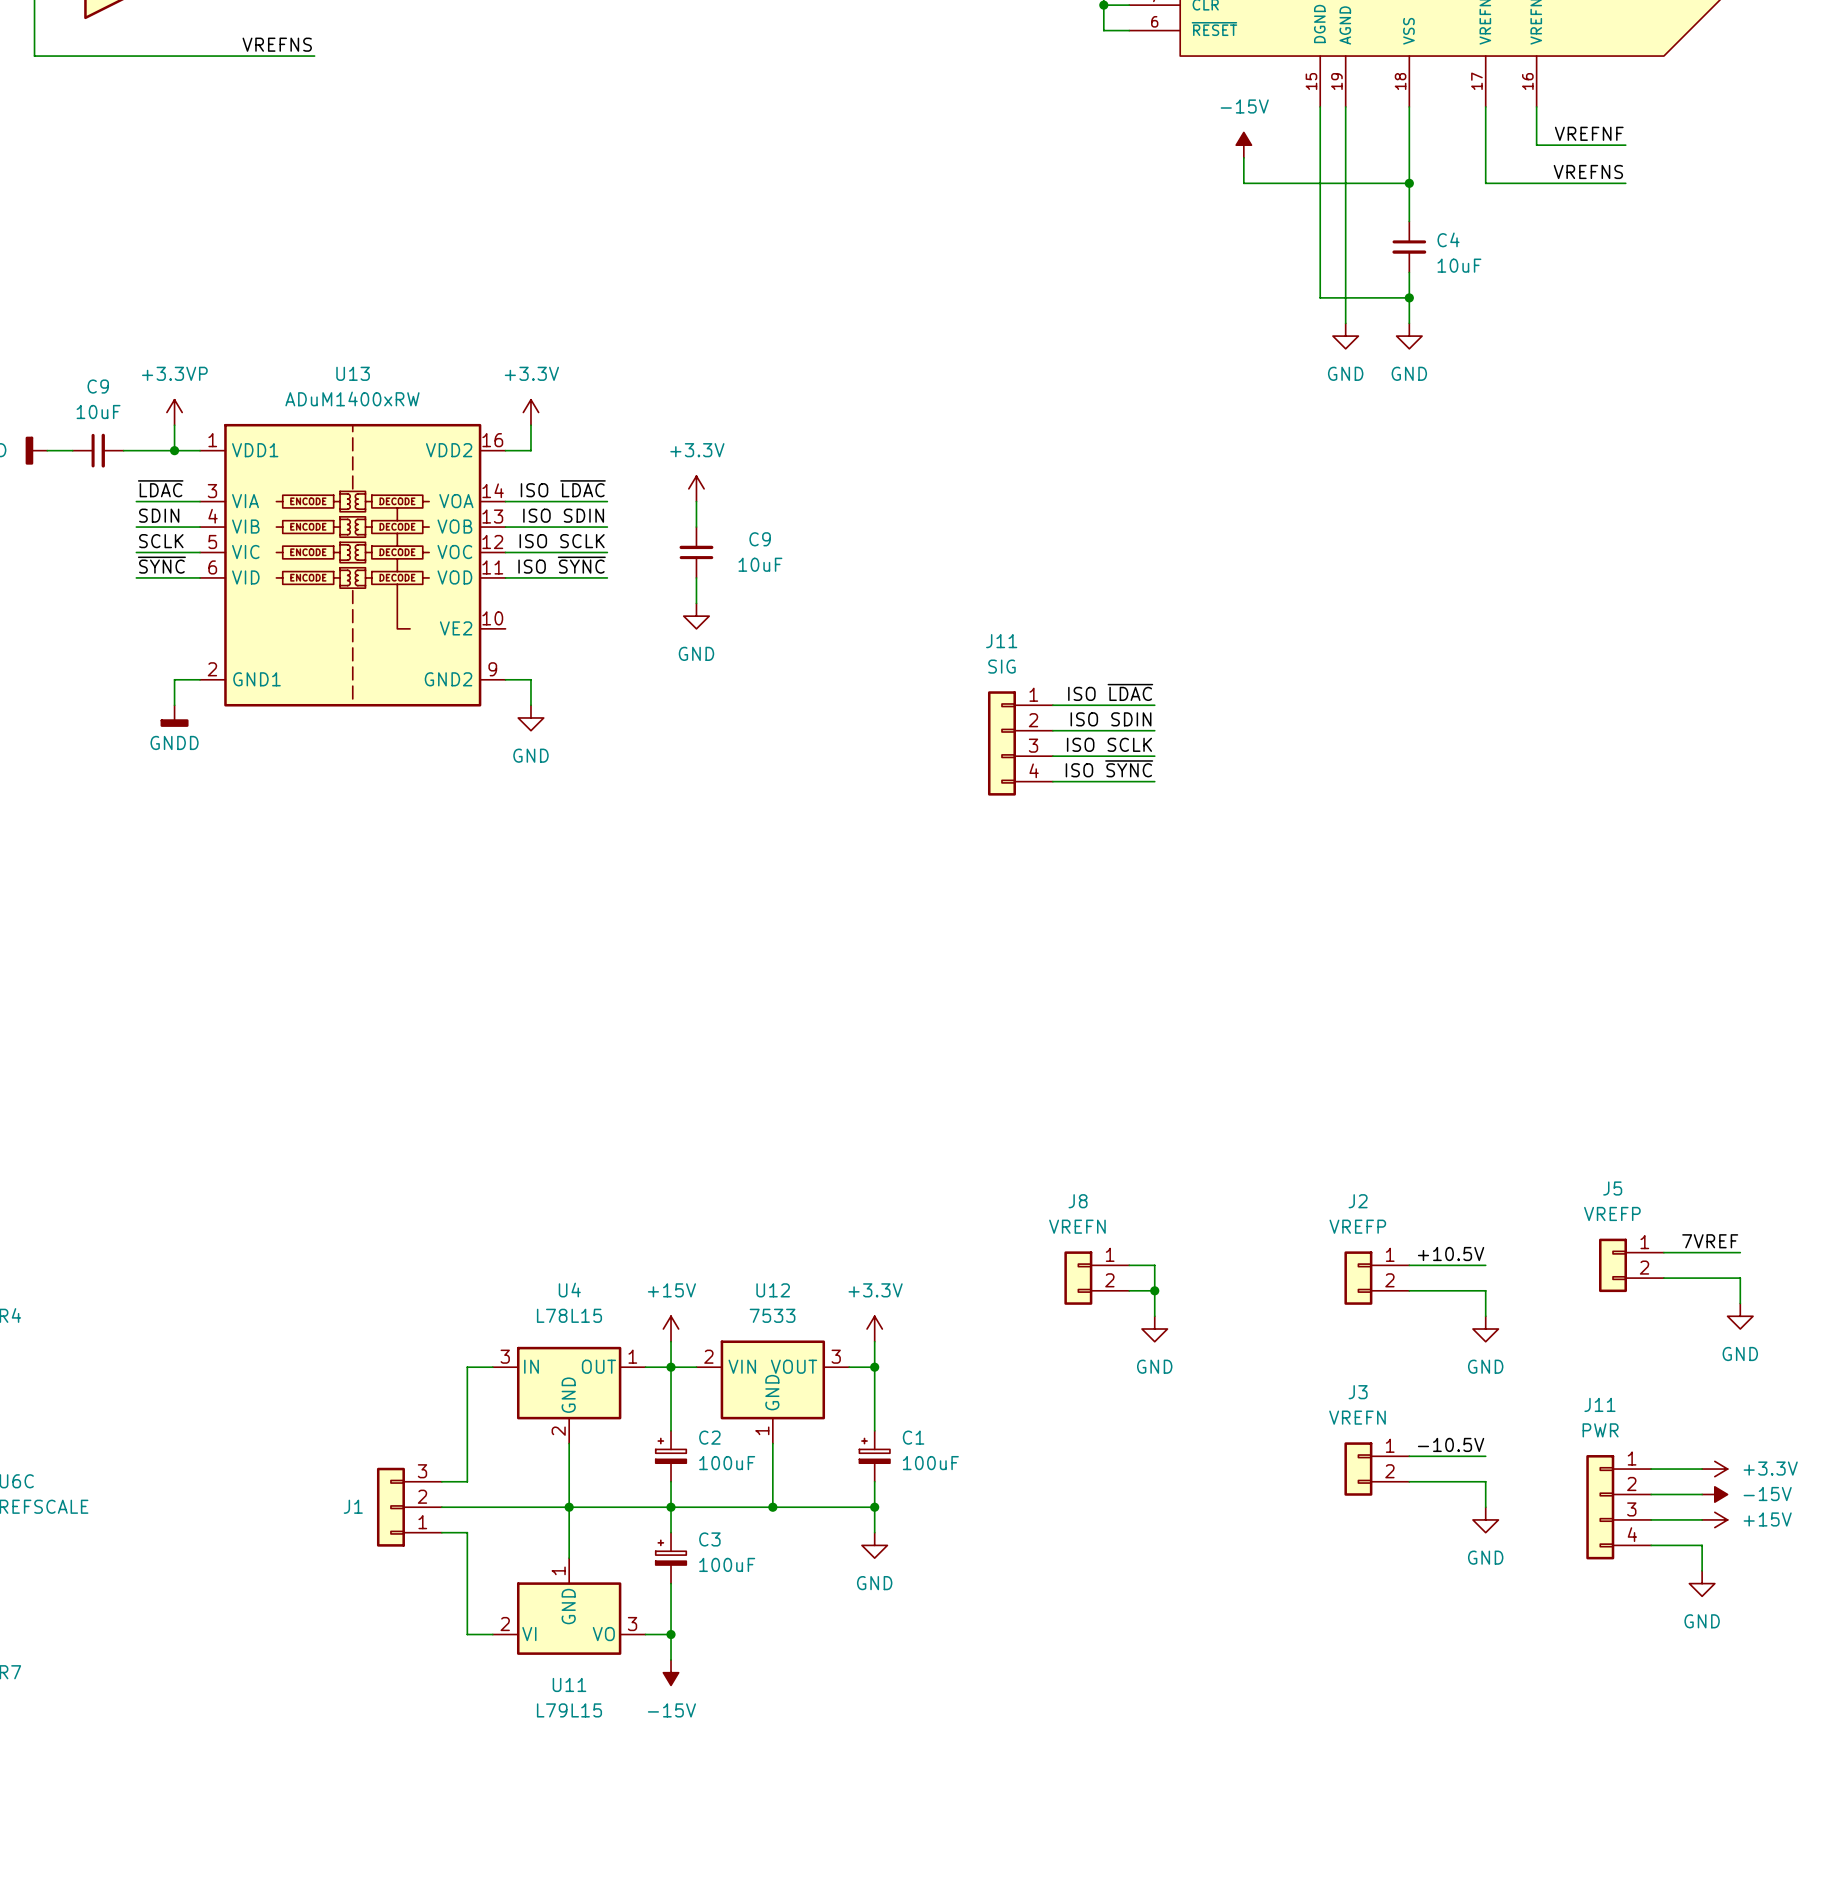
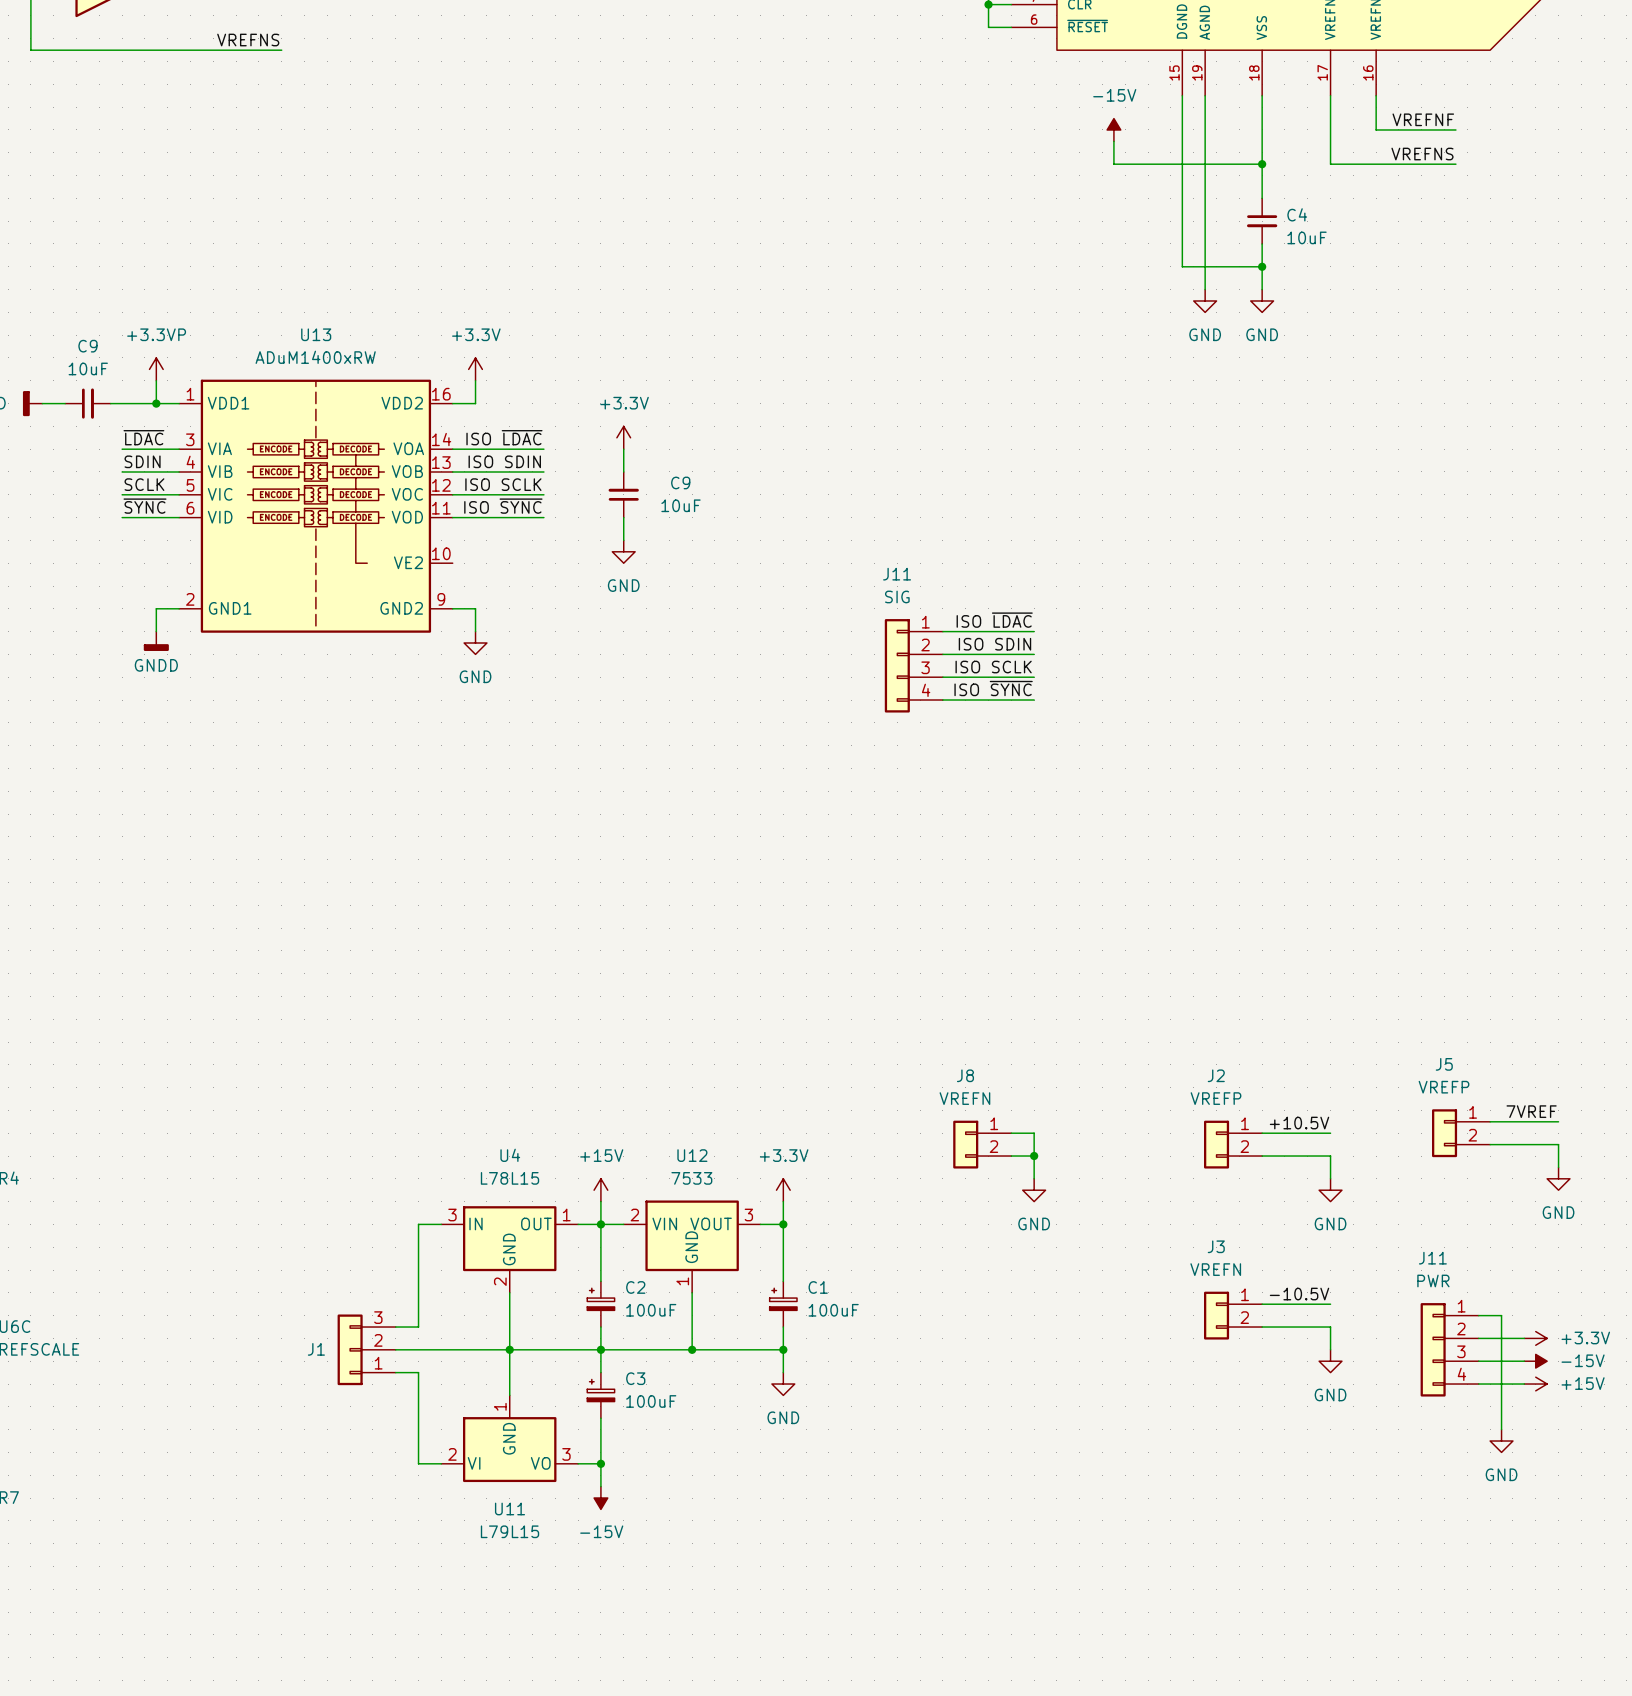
wire: (1676, 1469) (1702, 1469) -> (1501, 1315) (1501, 1429)
power symbol: +3.3V (1714, 1469) -> none
power symbol: -15V (1714, 1494) -> +3.3V (1535, 1338)
power symbol: +15V (1714, 1519) -> -15V (1535, 1361)
wire: (1702, 1545) (1702, 1570) -> none
power symbol: none -> +15V (1535, 1384)
power symbol position: GND (1702, 1583) -> GND (1501, 1441)

